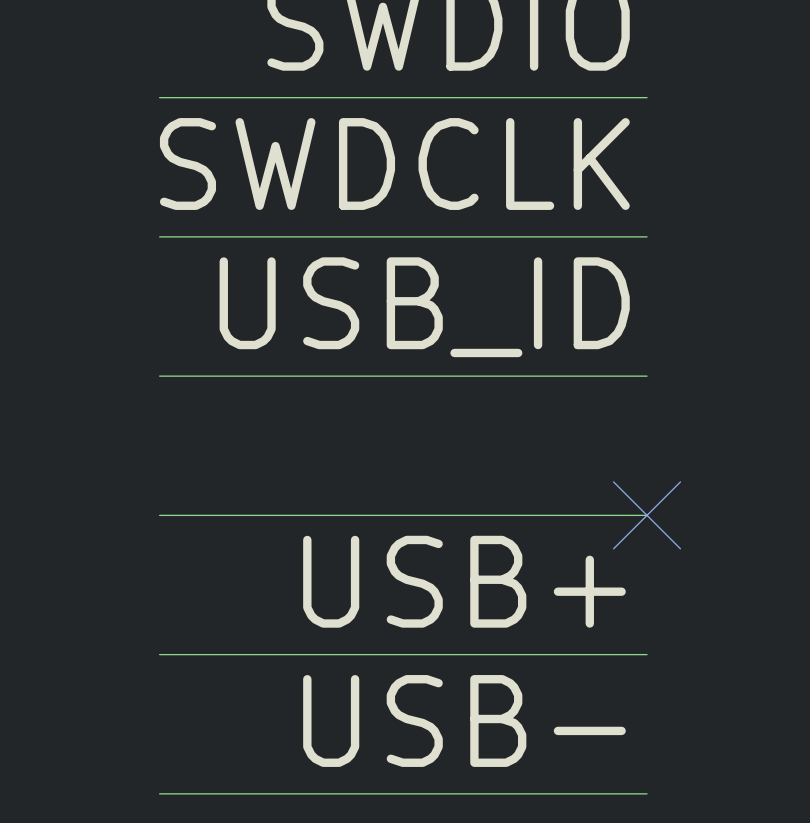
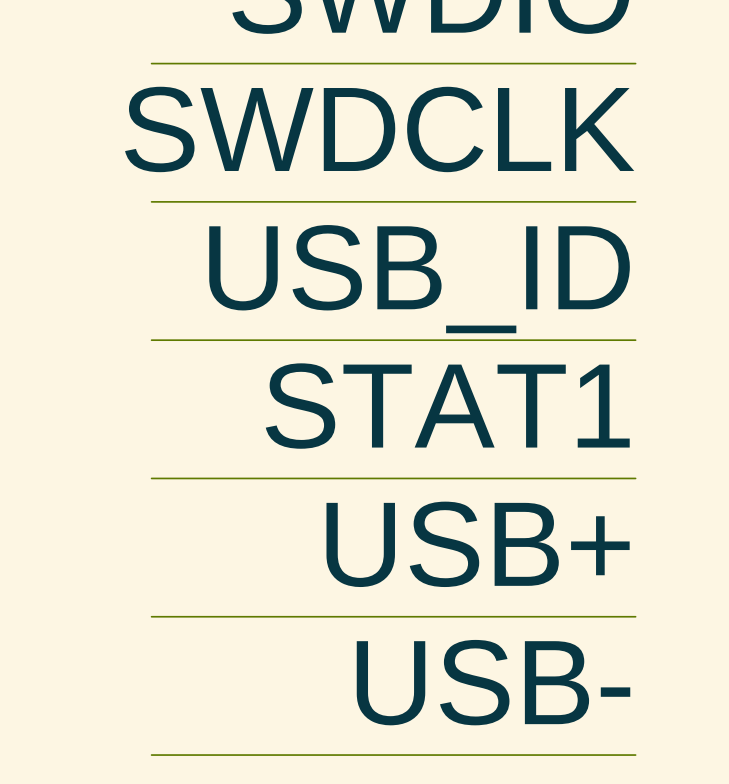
label: none -> STAT1 (447, 406)
no-connect mark: (647, 515) -> none

